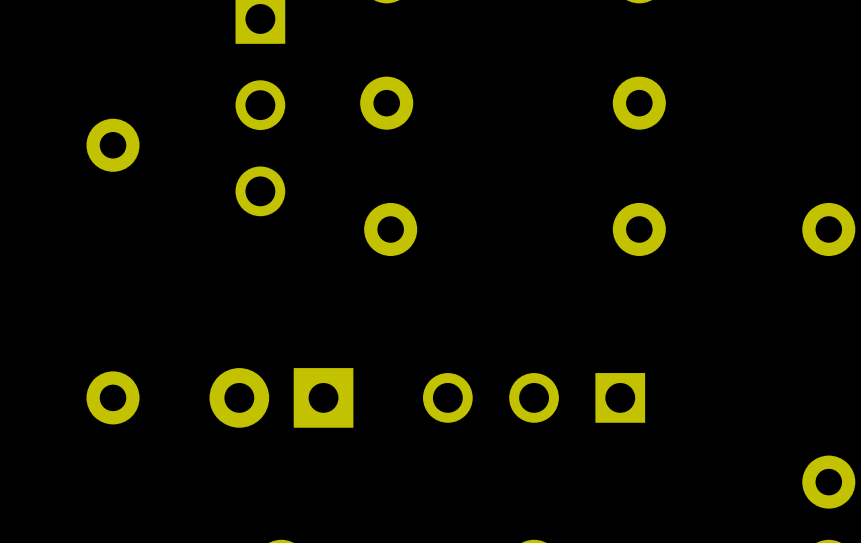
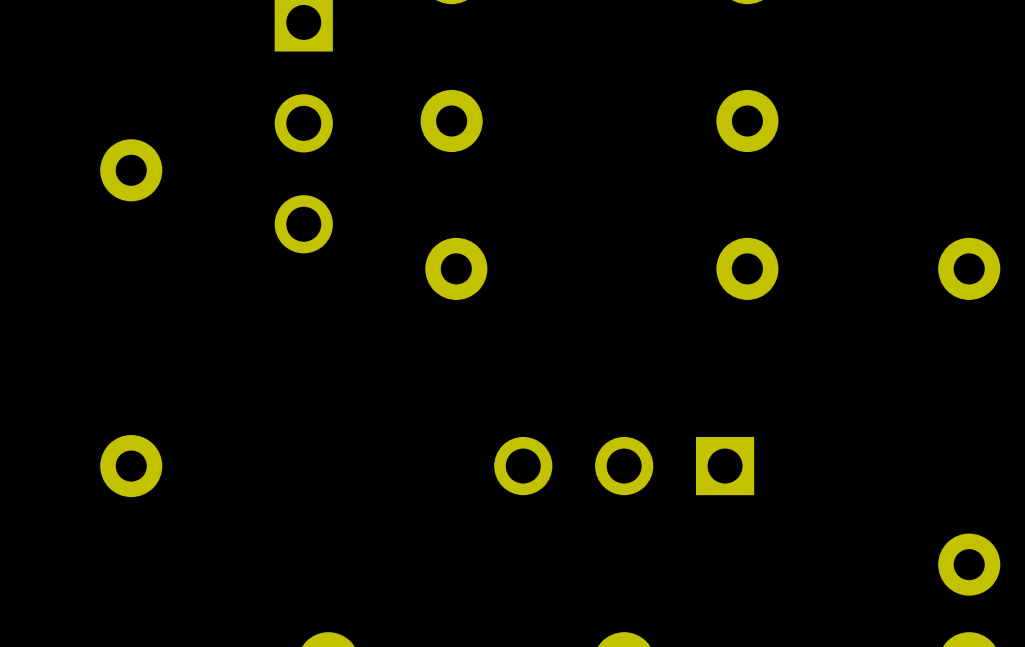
part: (281, 397) -> none

